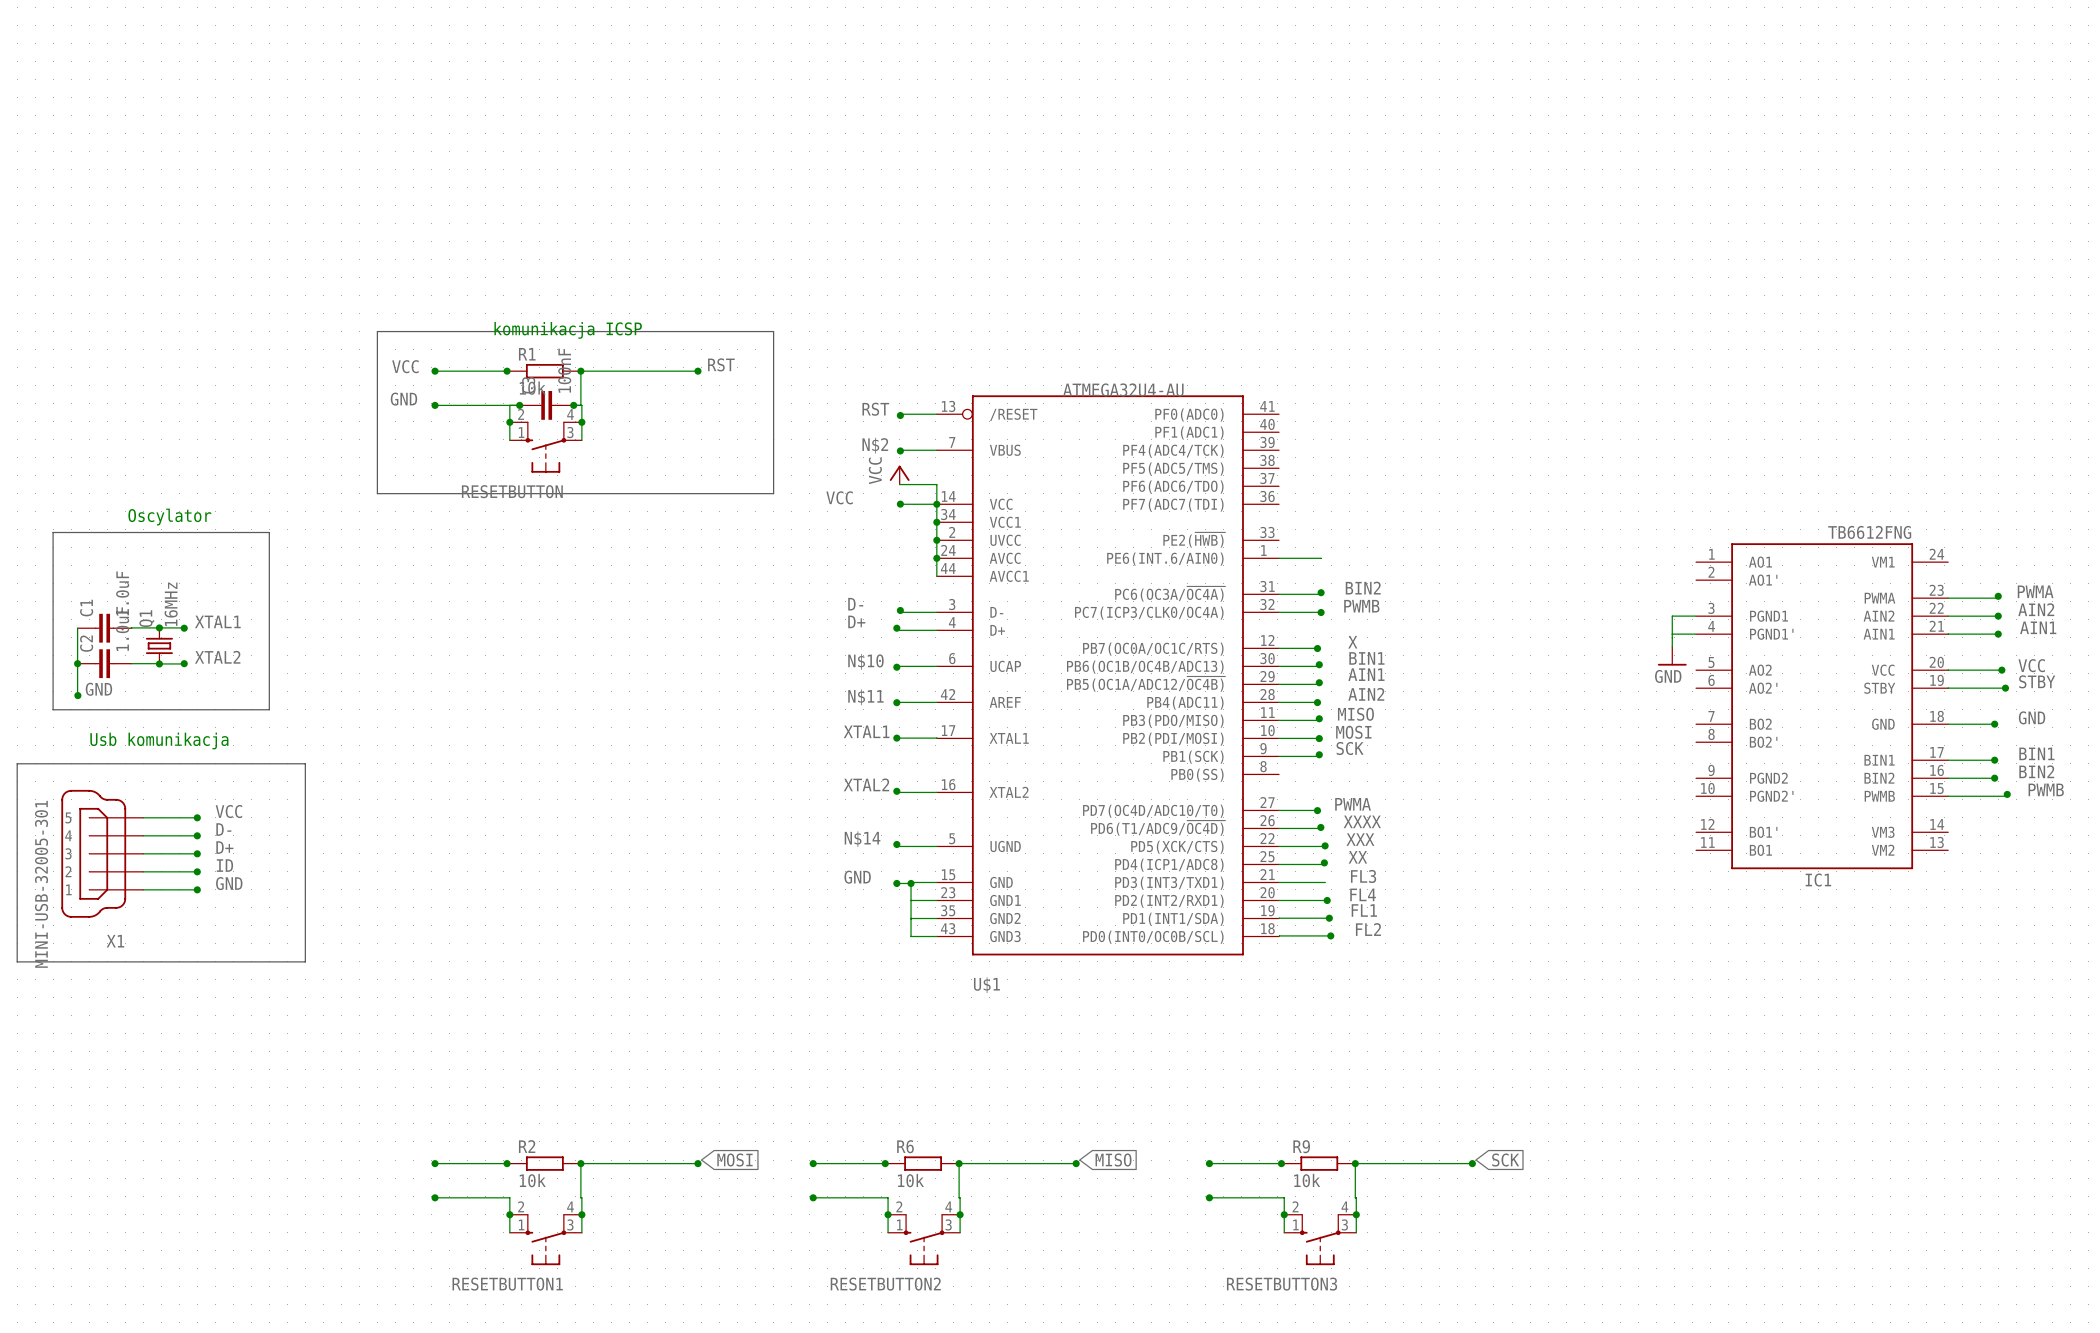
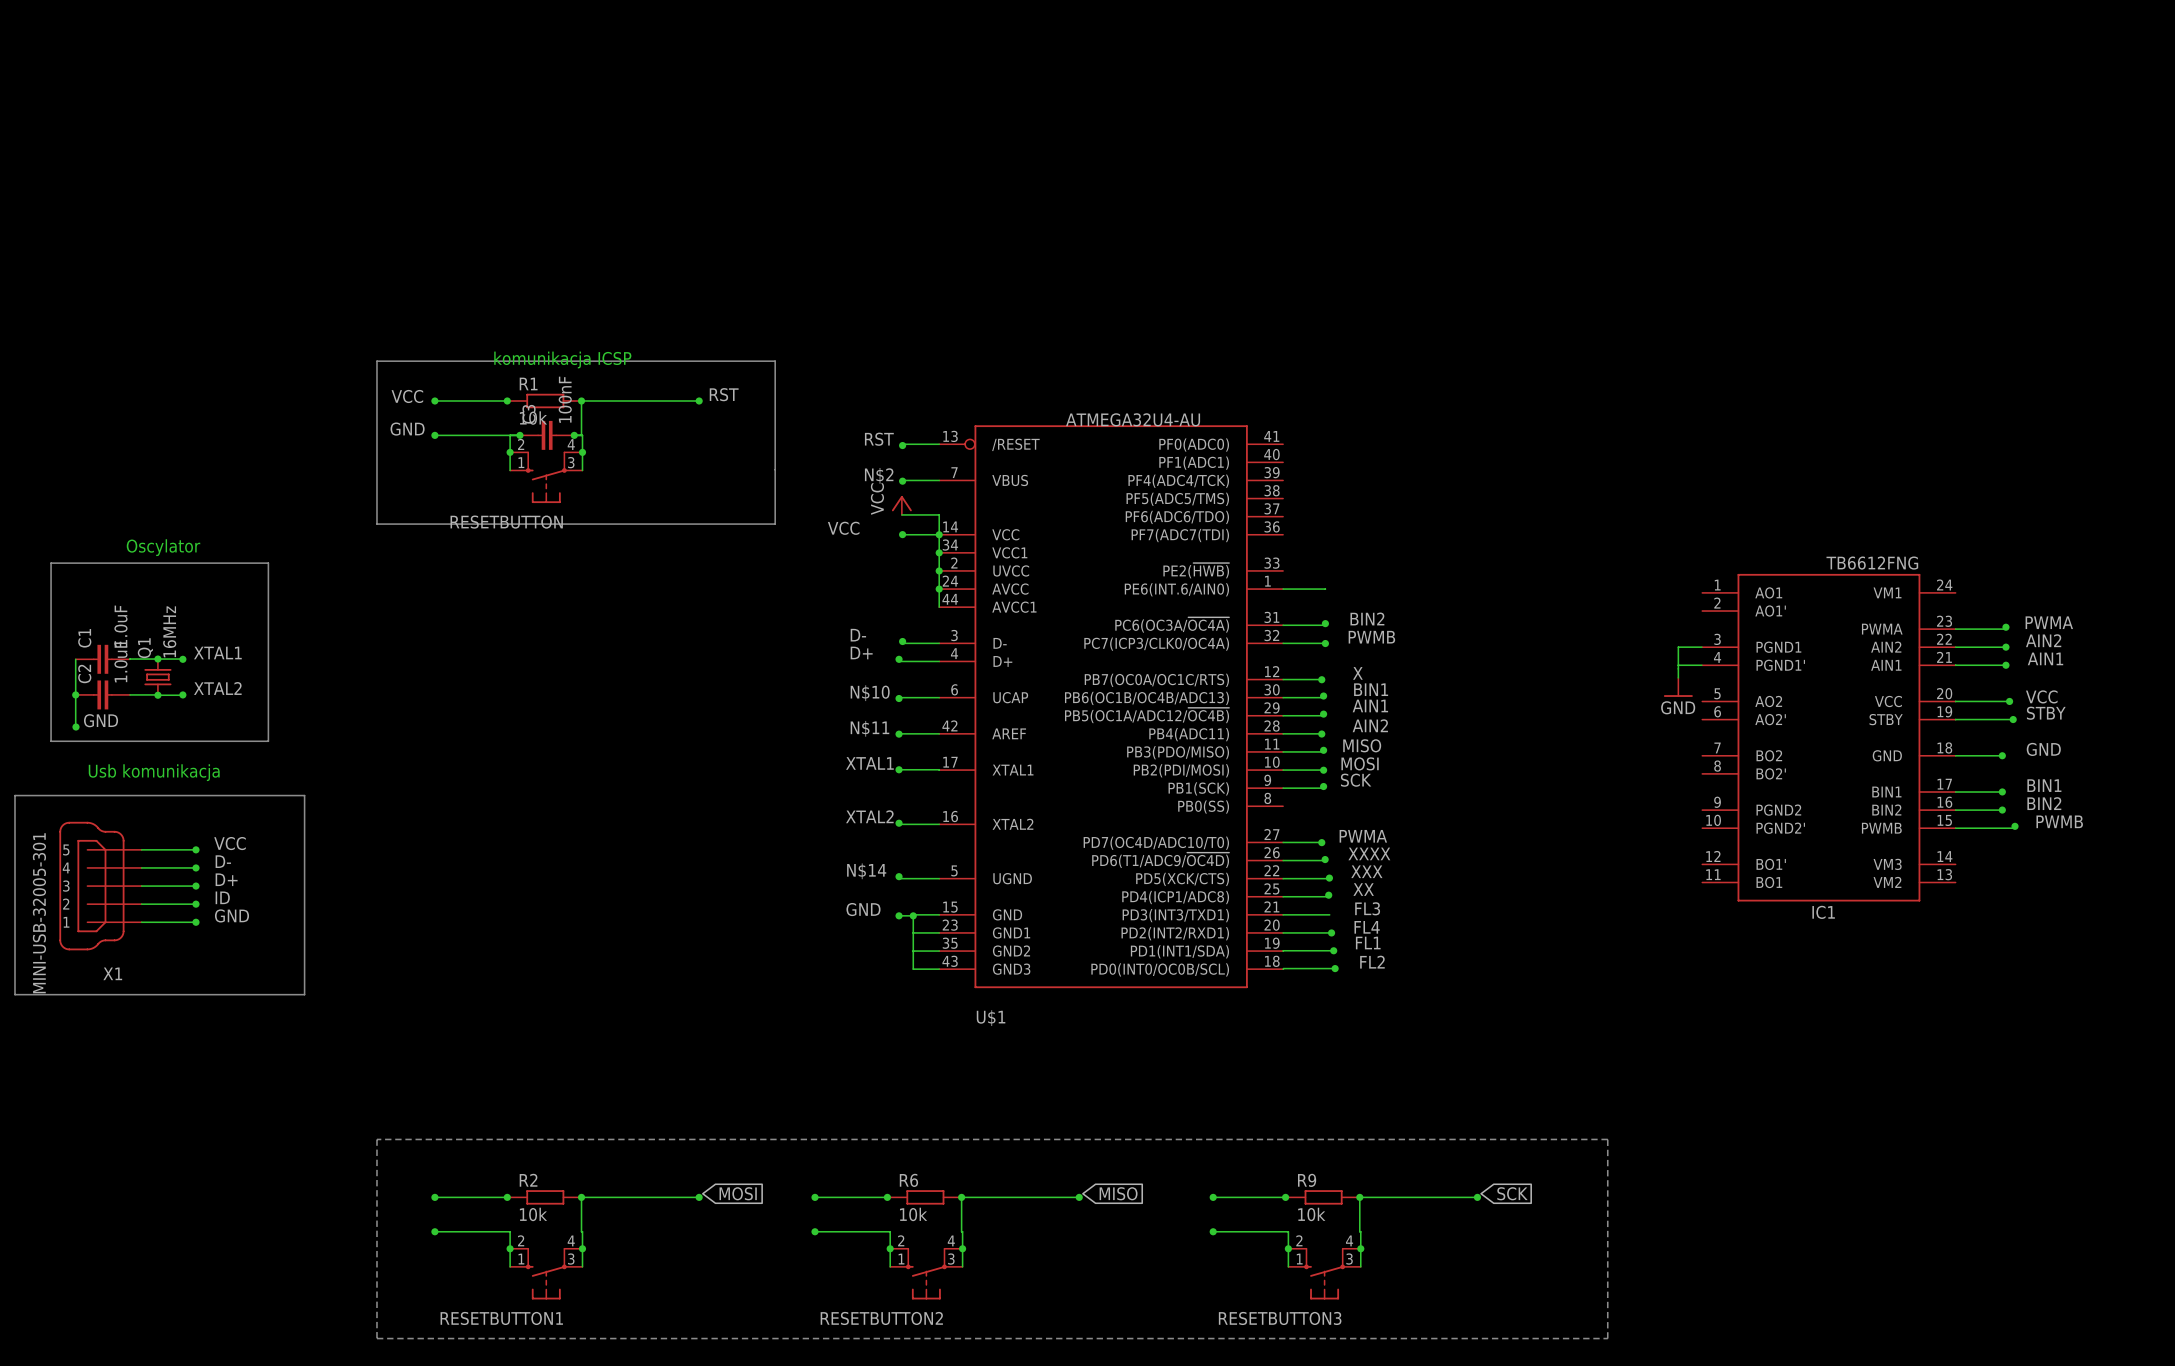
bus: none -> (376, 1139) (376, 1338) (1607, 1338) (1607, 1139) (376, 1139)

